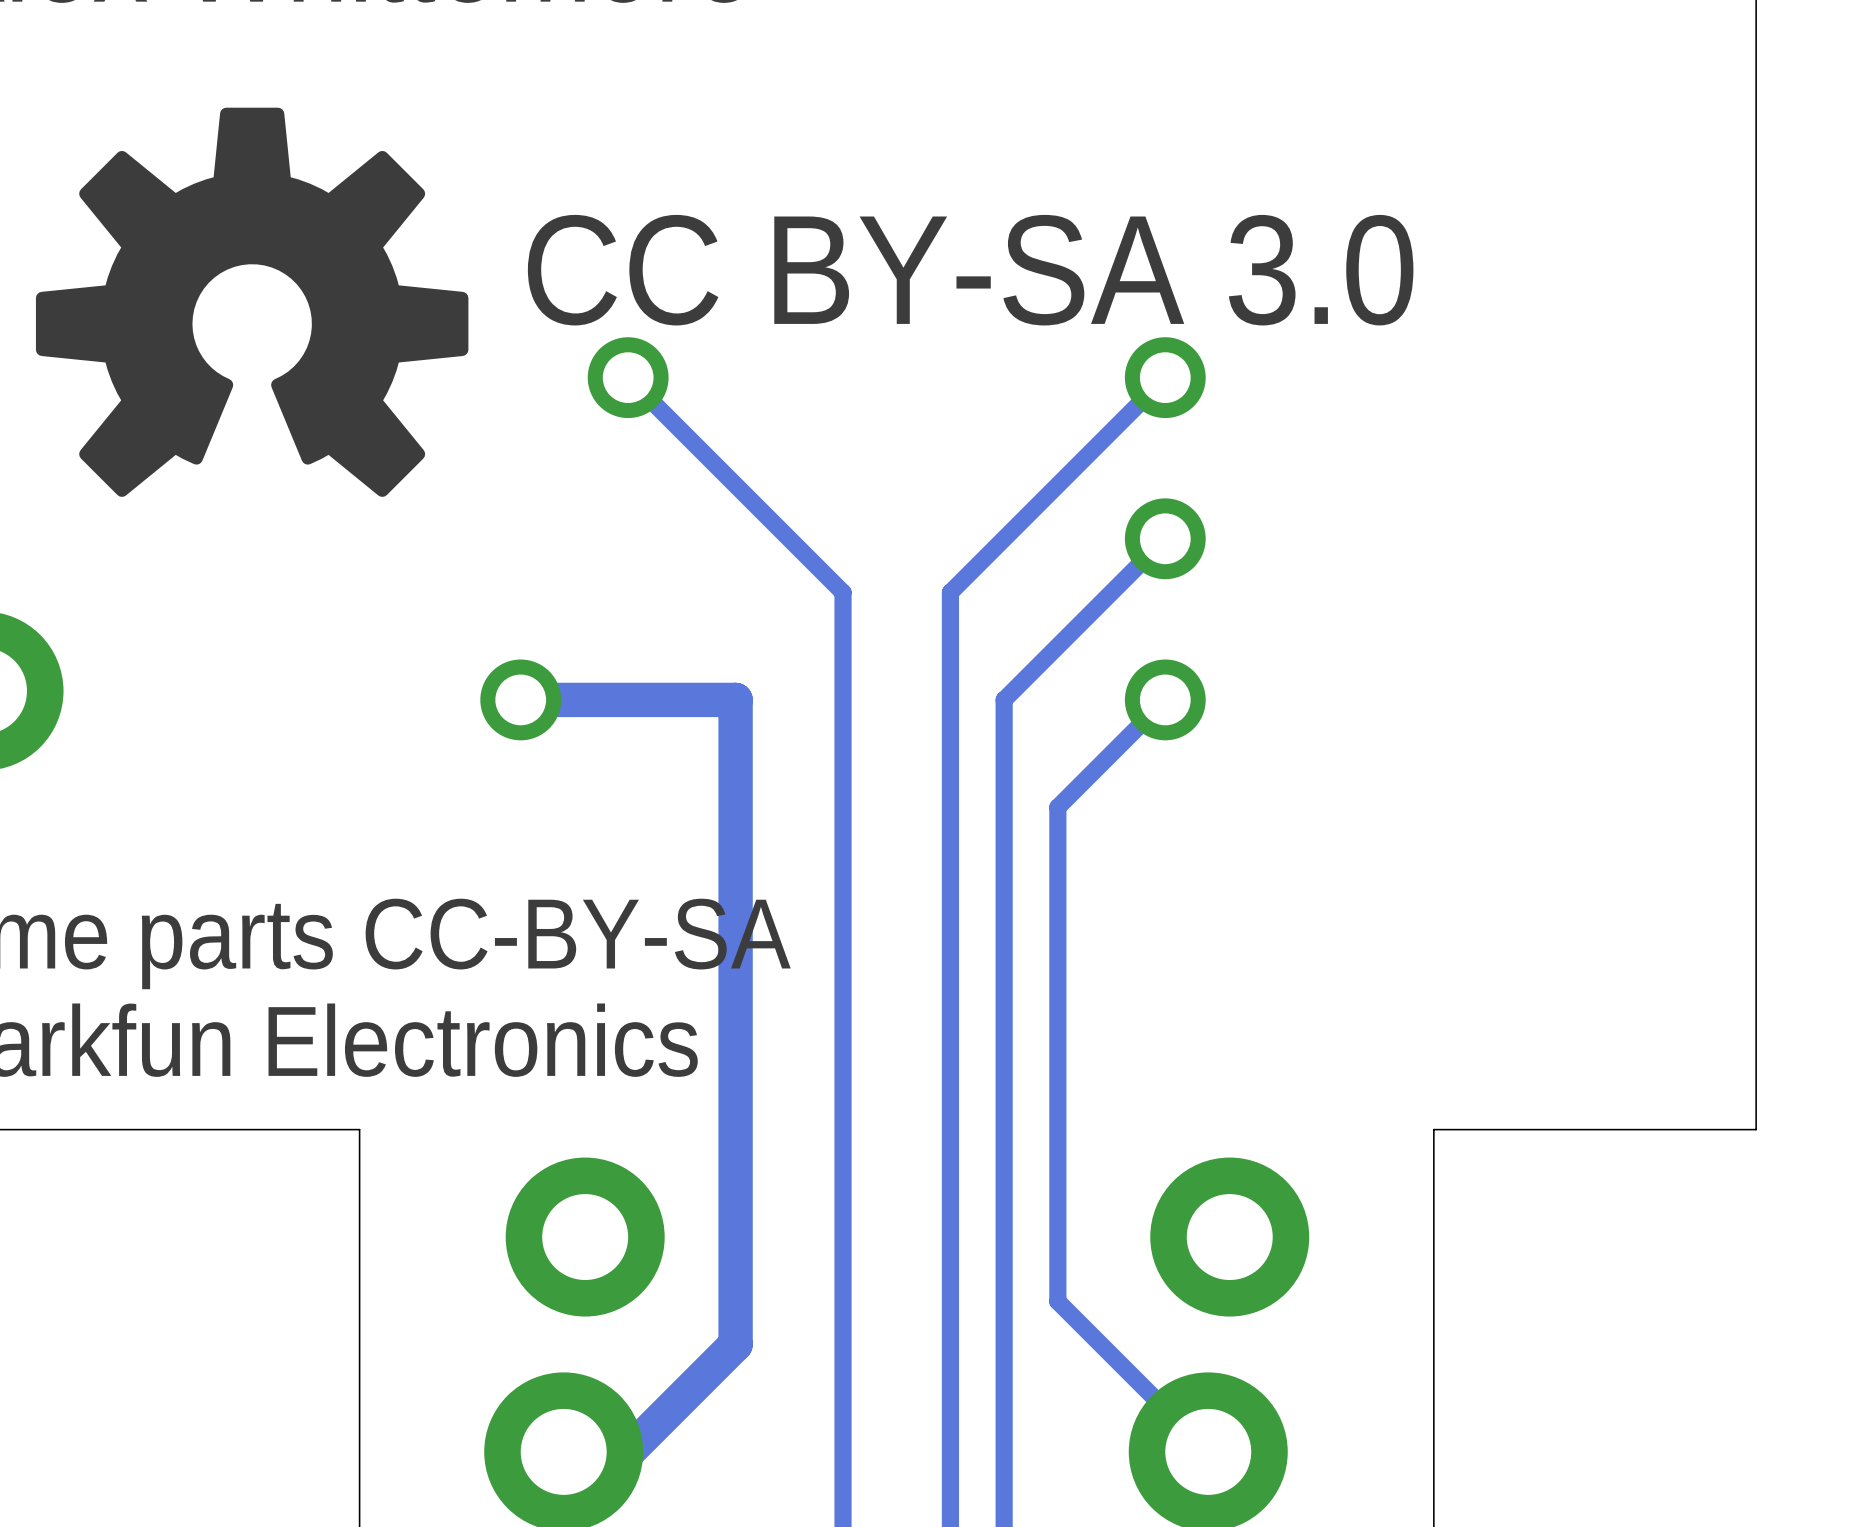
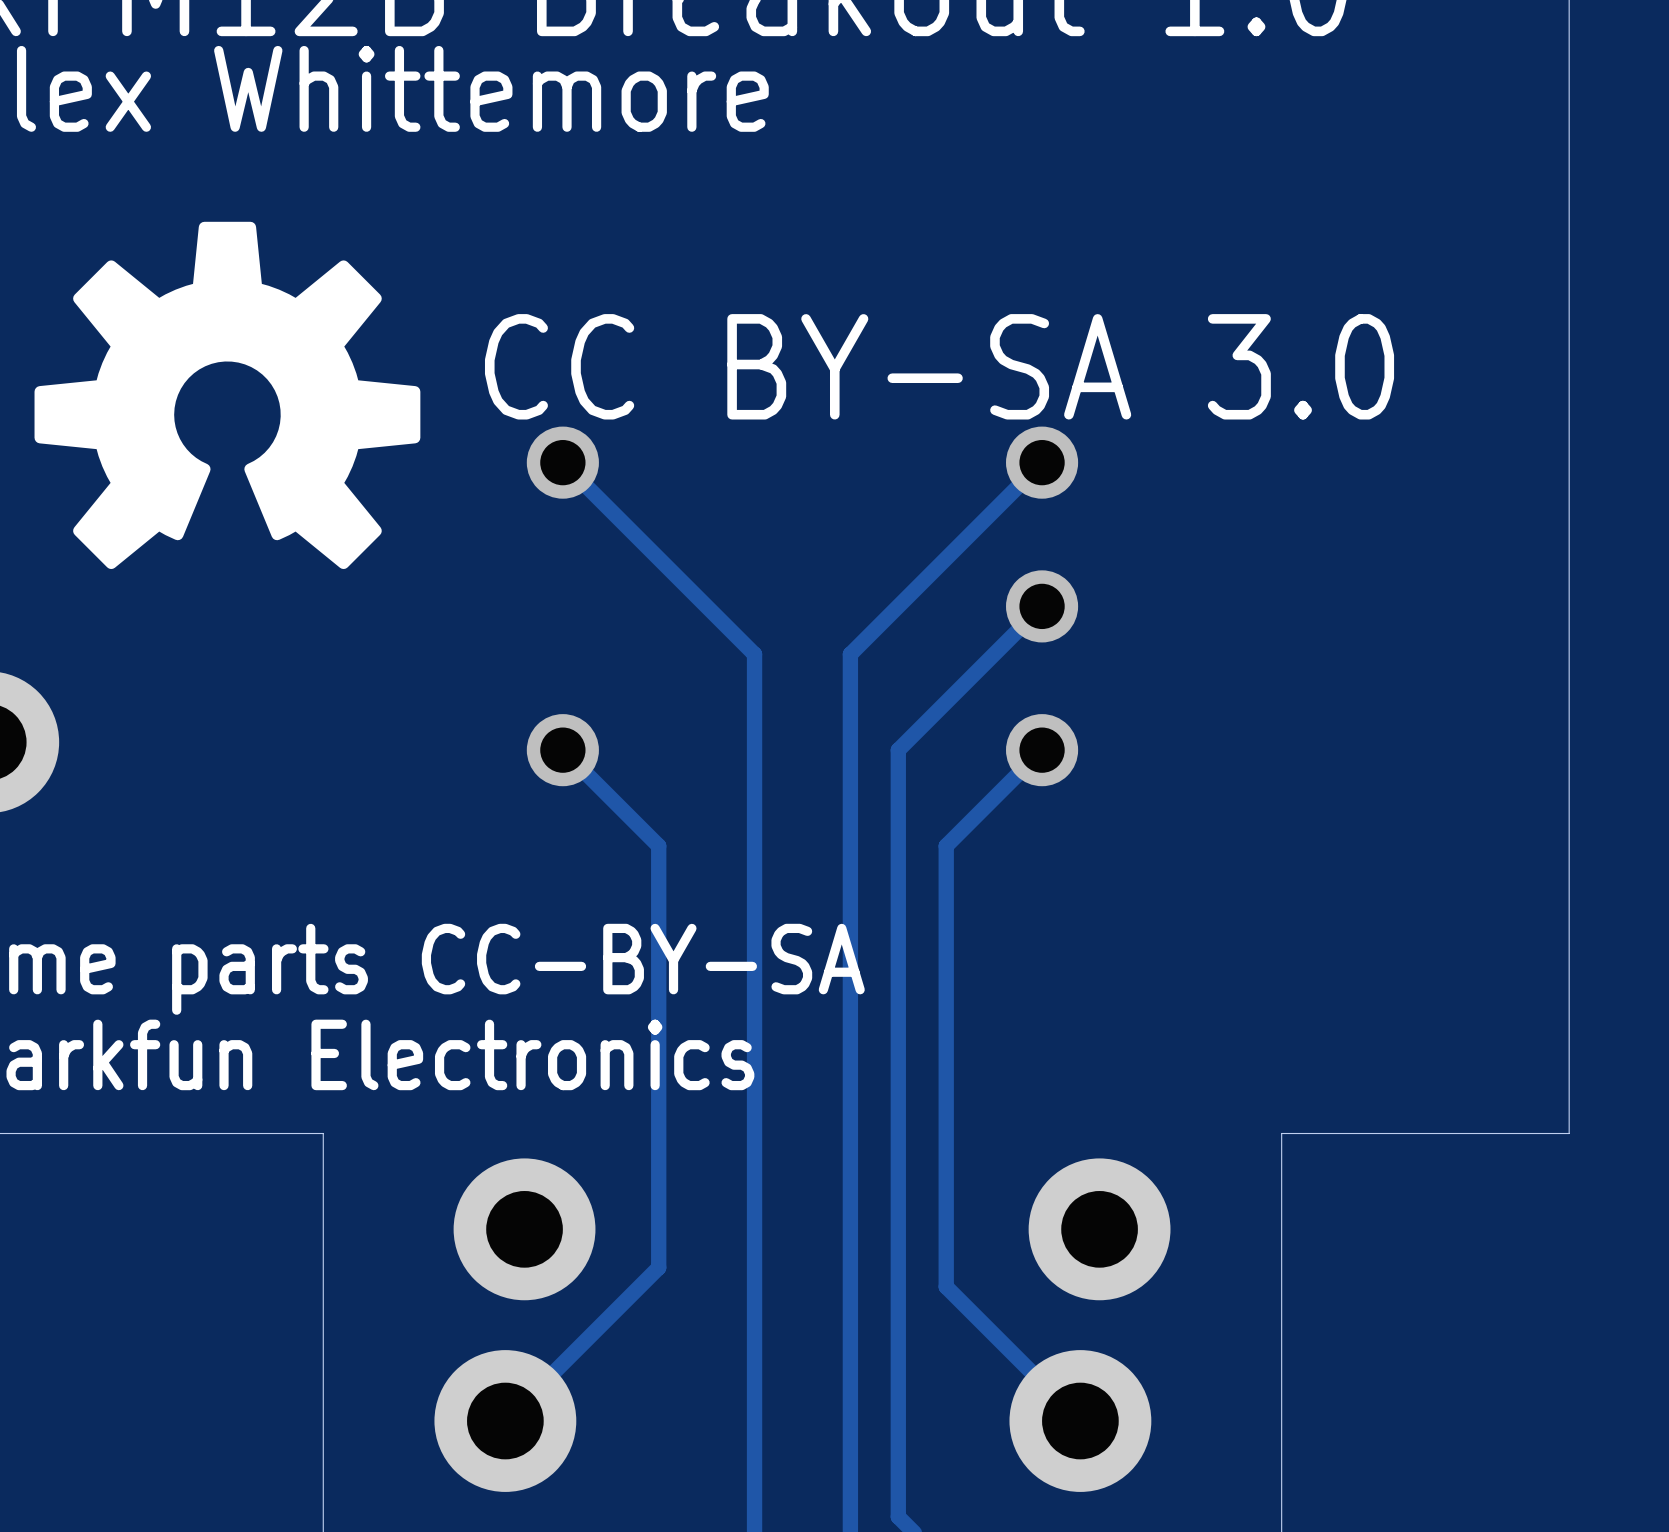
track: (520, 699) (735, 699) (735, 807) -> (562, 750) (658, 845)
via position: (520, 699) -> (562, 750)
track width: thick (735, 807) (735, 1280) -> thin (658, 845) (658, 1267)
track: (735, 1280) (735, 1344) (628, 1451) (563, 1451) -> (658, 1267) (505, 1421)

